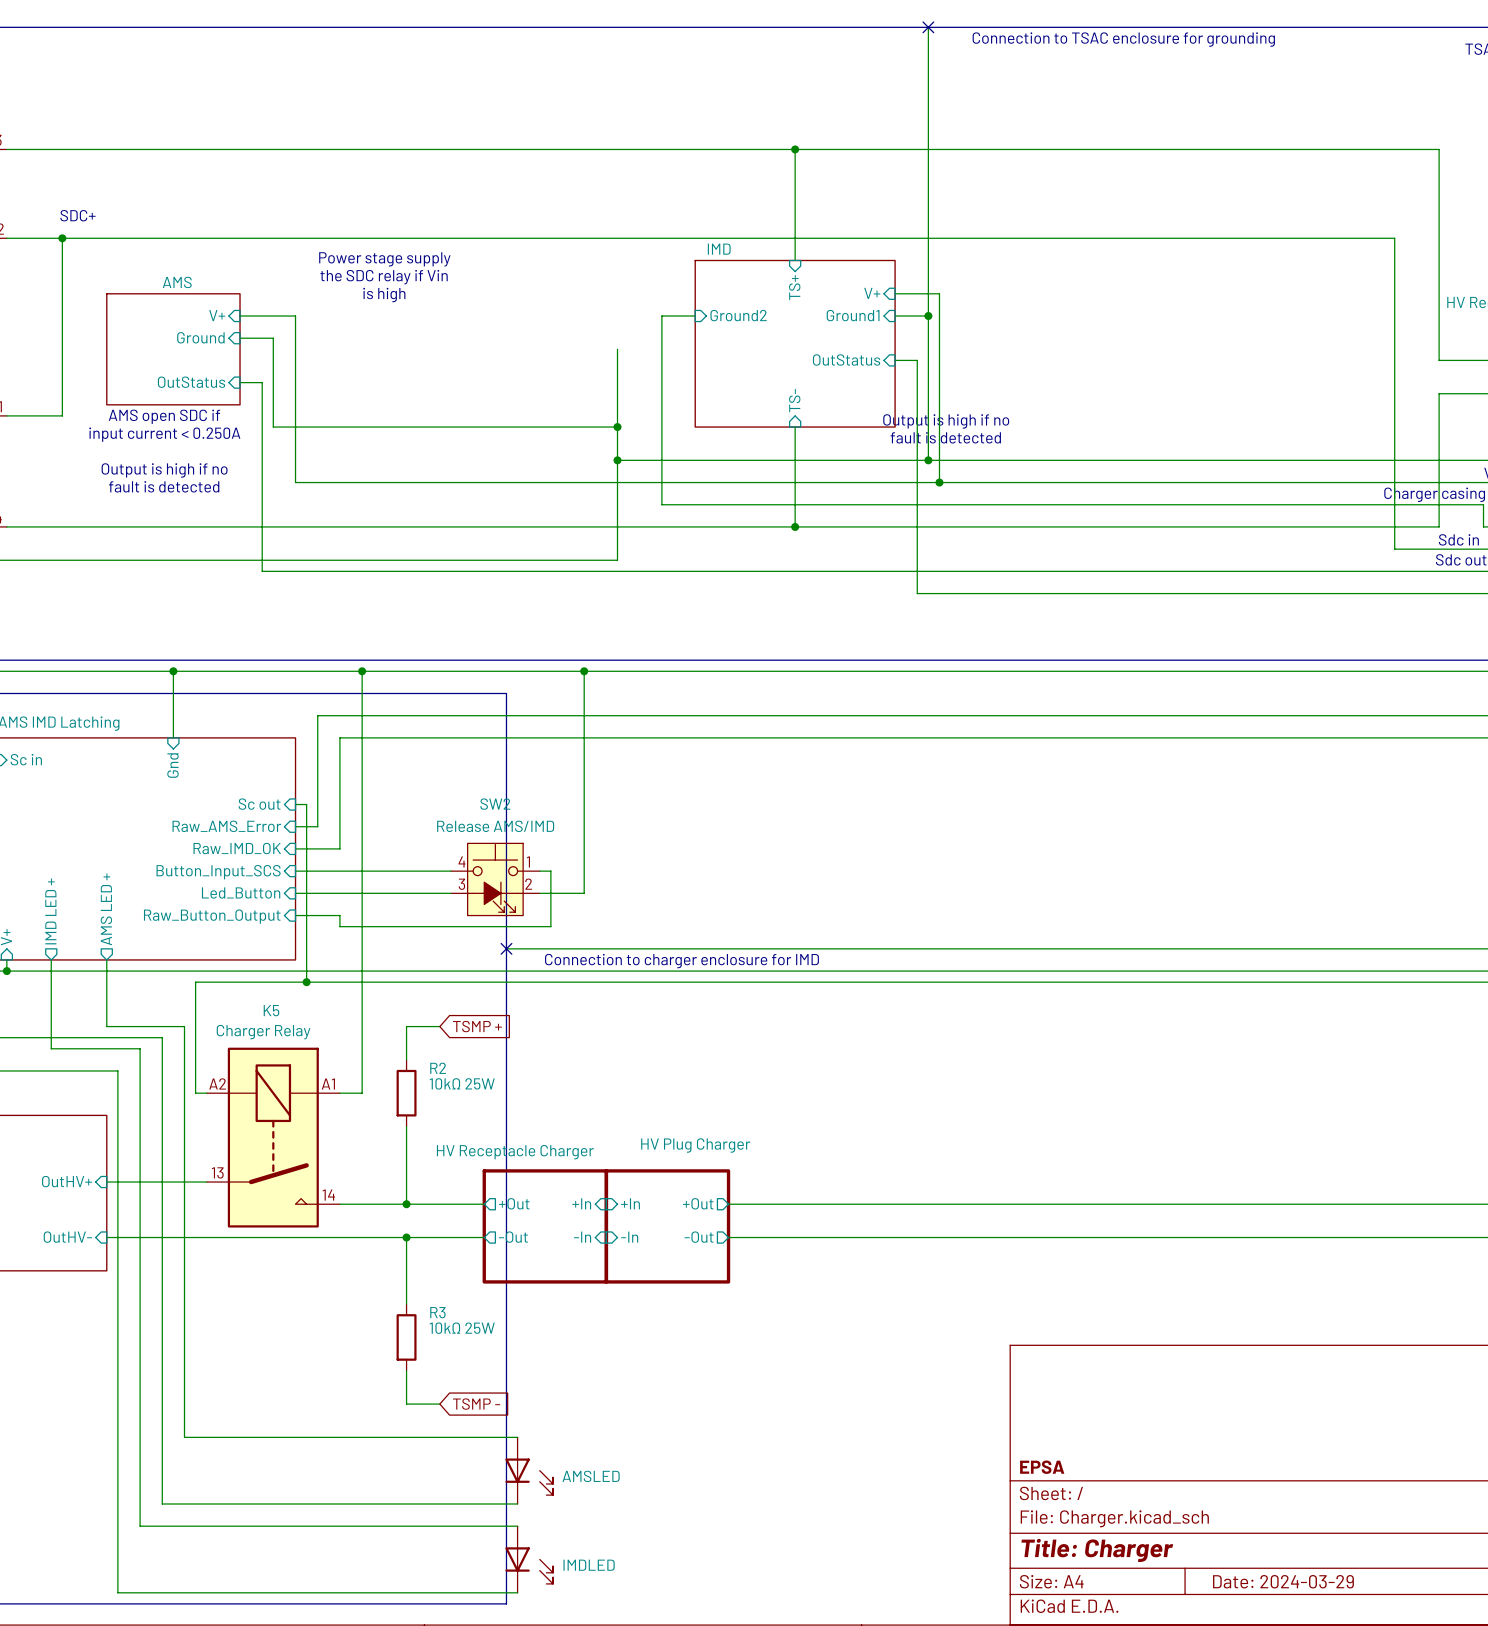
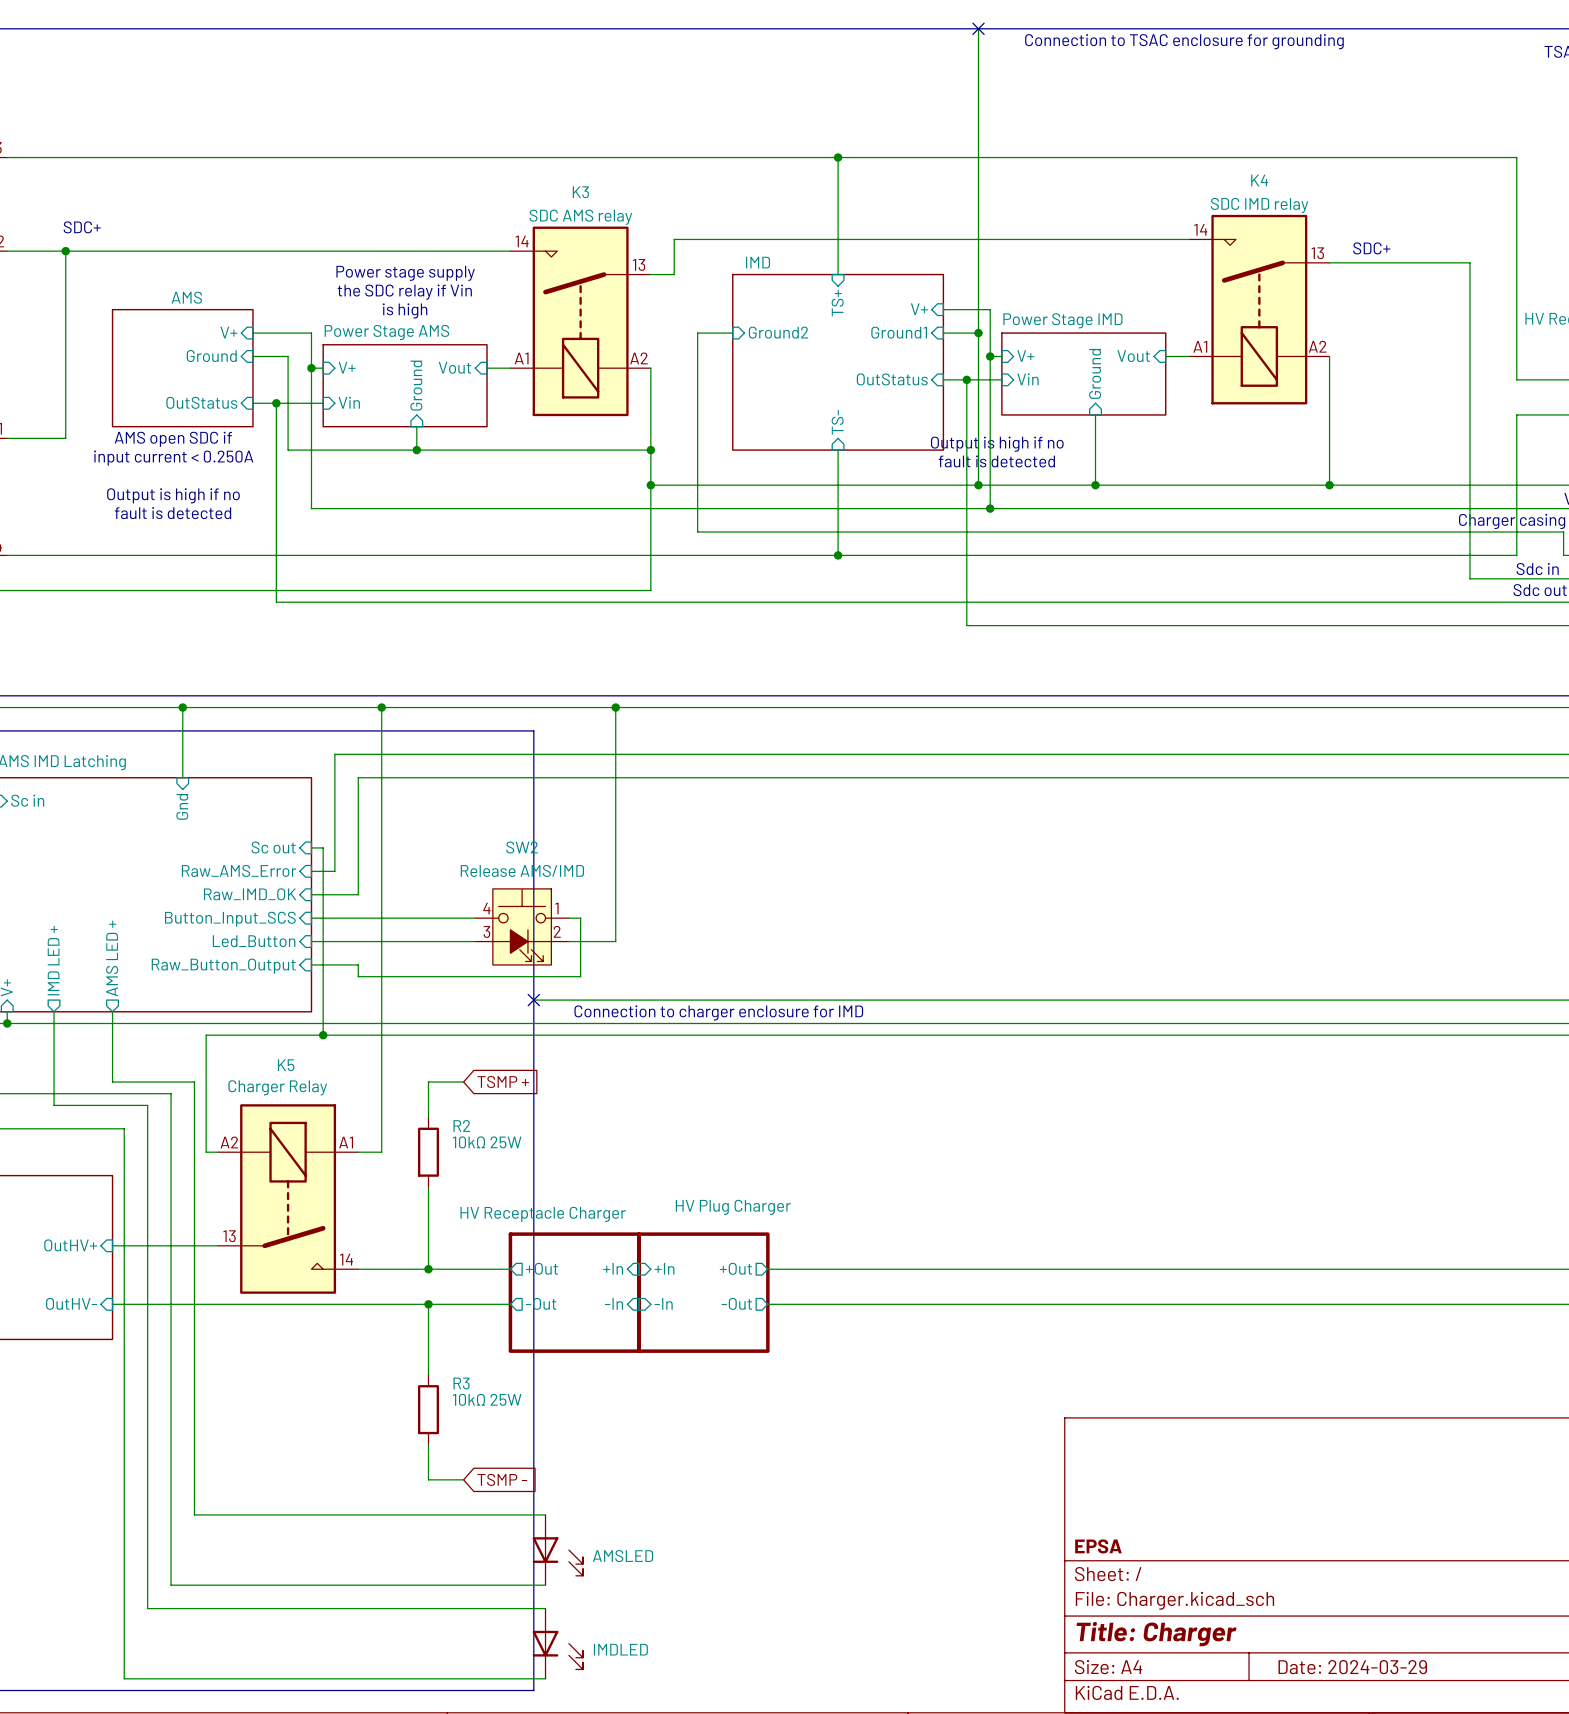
wire: none -> (1189, 239) (674, 239) (674, 274) (650, 274)
text: none -> SDC+ (1371, 248)
wire: (484, 238) (1394, 238) (1394, 249) -> (1329, 262) (1469, 262)
K4: none -> SDC IMD relay (1259, 309)
K3: none -> SDC AMS relay (580, 321)
sheet pin: none -> V+ (1025, 356)
sheet pin: none -> Vout (1133, 356)
wire: none -> (990, 356) (1001, 356)
junction: none -> (990, 356)
wire: none -> (1165, 356) (1189, 356)
wire: none -> (1329, 356) (1329, 485)
sheet pin: none -> V+ (347, 367)
sheet pin: none -> Vout (454, 367)
wire: none -> (311, 368) (323, 368)
junction: none -> (311, 368)
wire: none -> (487, 368) (510, 368)
sheet Power Stage IMD: none -> (1083, 374)
sheet pin: none -> Ground (1095, 373)
sheet pin: none -> Vin (1027, 379)
wire: none -> (966, 379) (1001, 379)
junction: none -> (966, 379)
sheet Power Stage AMS: none -> (405, 385)
sheet pin: none -> Ground (416, 385)
wire: none -> (276, 403) (323, 403)
junction: none -> (276, 403)
sheet pin: none -> Vin (349, 402)
wire: none -> (1095, 414) (1095, 485)
wire: none -> (416, 426) (416, 450)
junction: none -> (416, 450)
junction: none -> (1095, 485)
junction: none -> (1329, 485)

